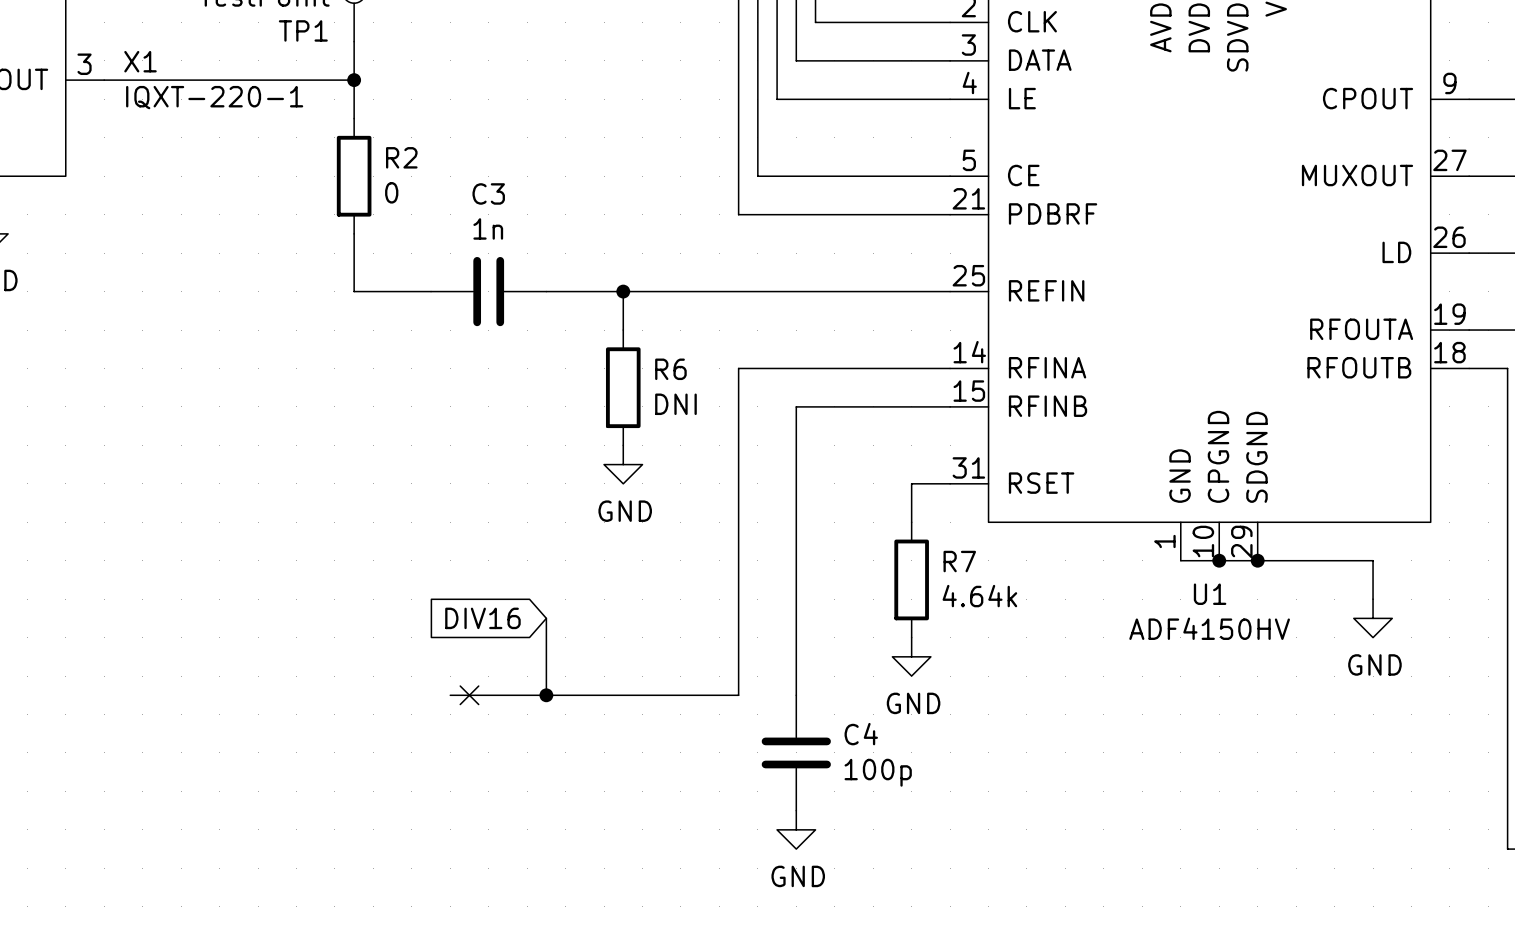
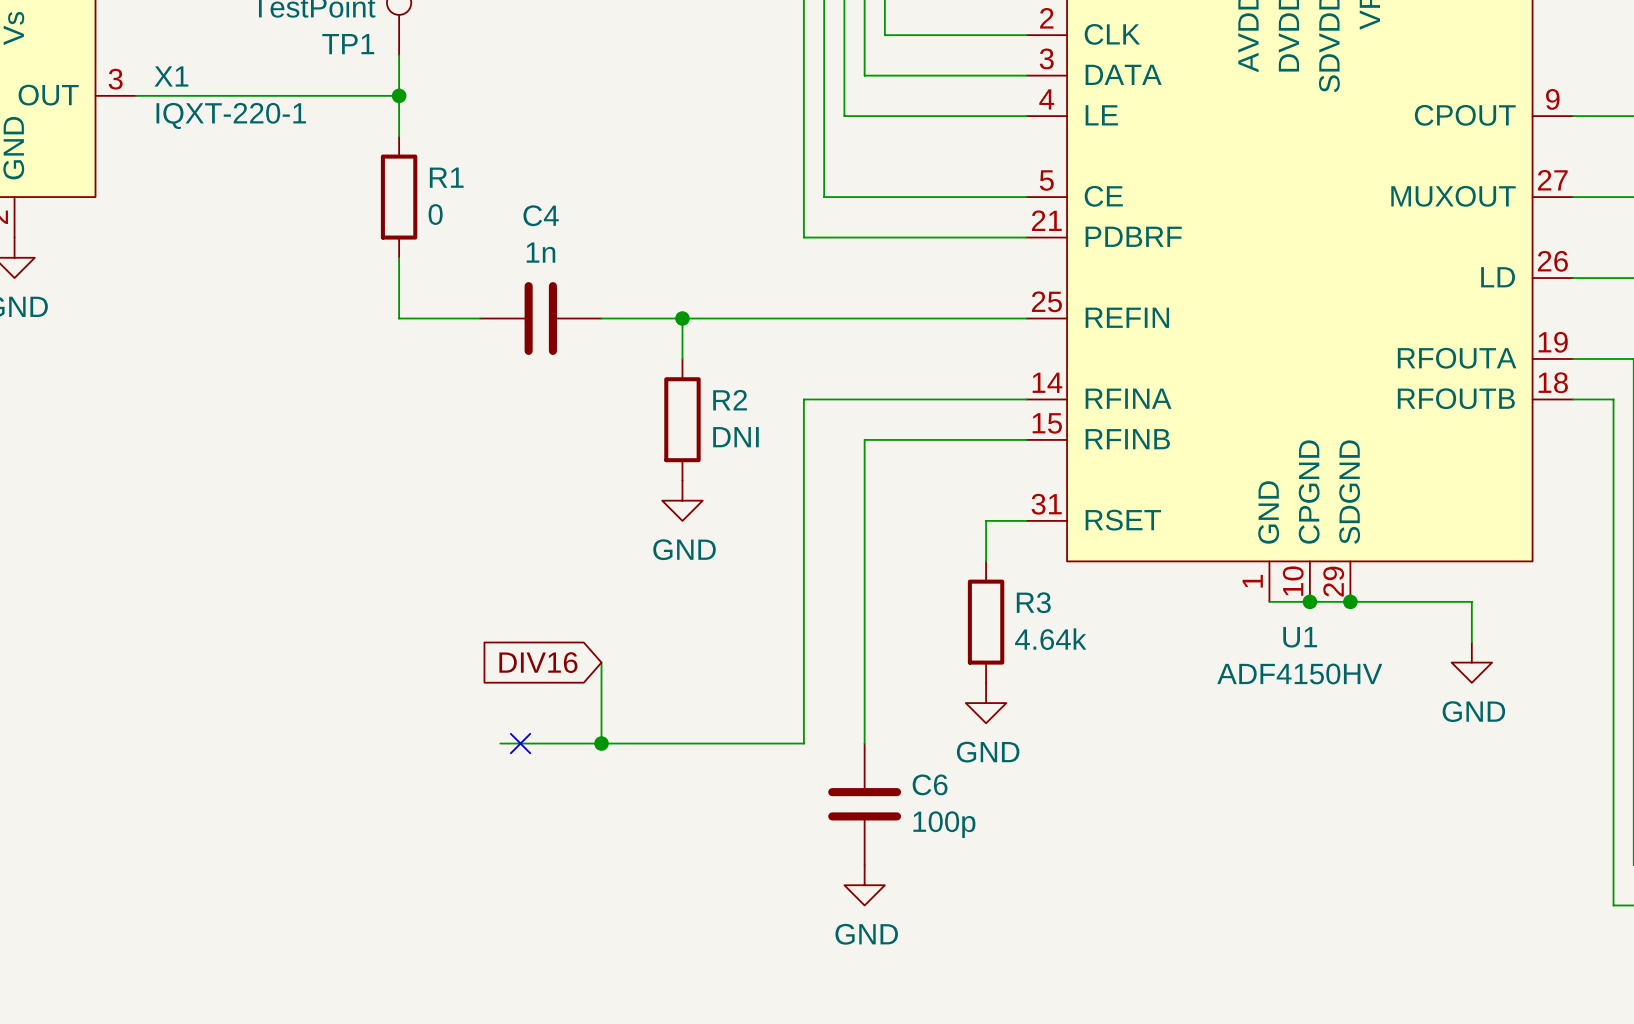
R2 name: R2 (401, 157) -> R1 (446, 177)
C3 name: C3 (488, 193) -> C4 (541, 215)
R6 name: R6 (670, 369) -> R2 (730, 400)
R7 name: R7 (959, 561) -> R3 (1033, 602)
C4 name: C4 (861, 734) -> C6 (930, 784)

